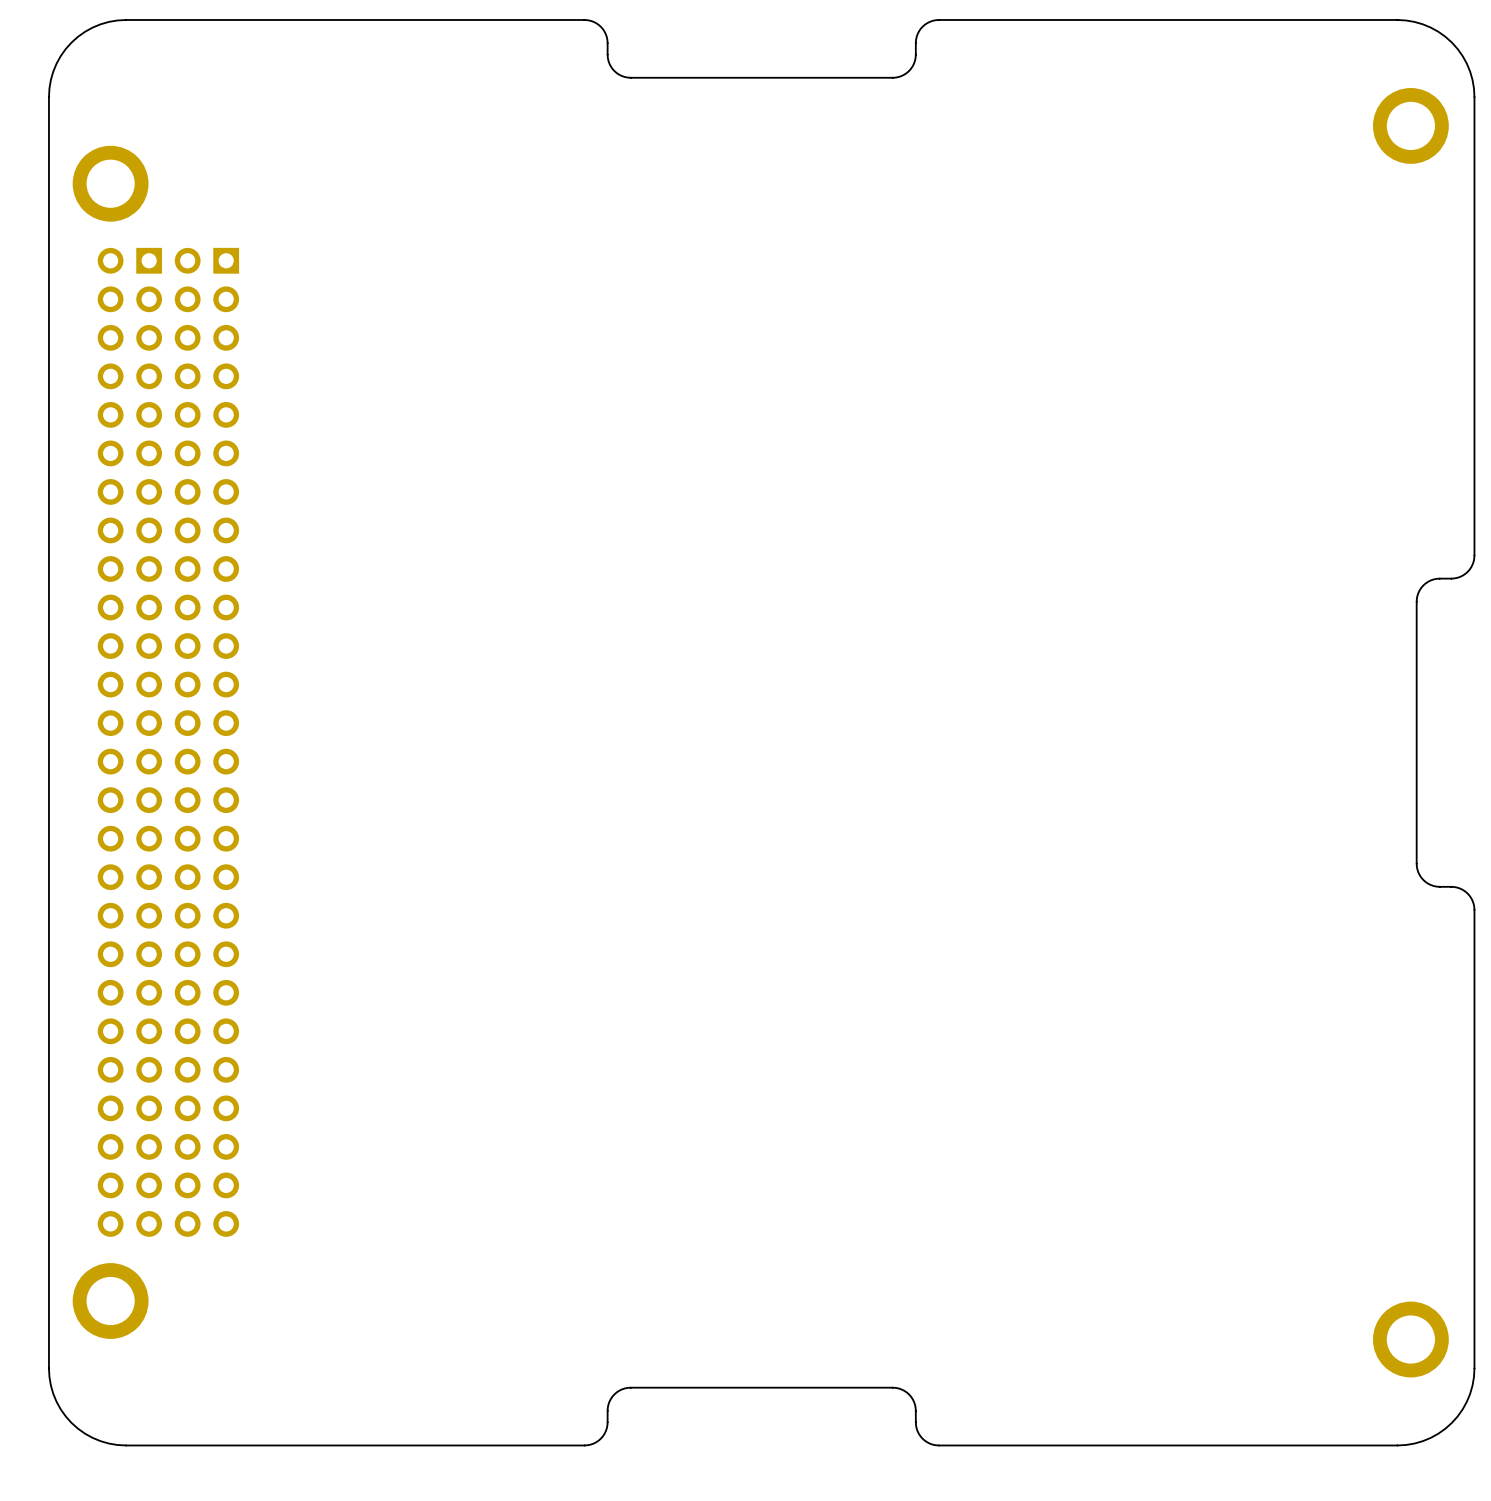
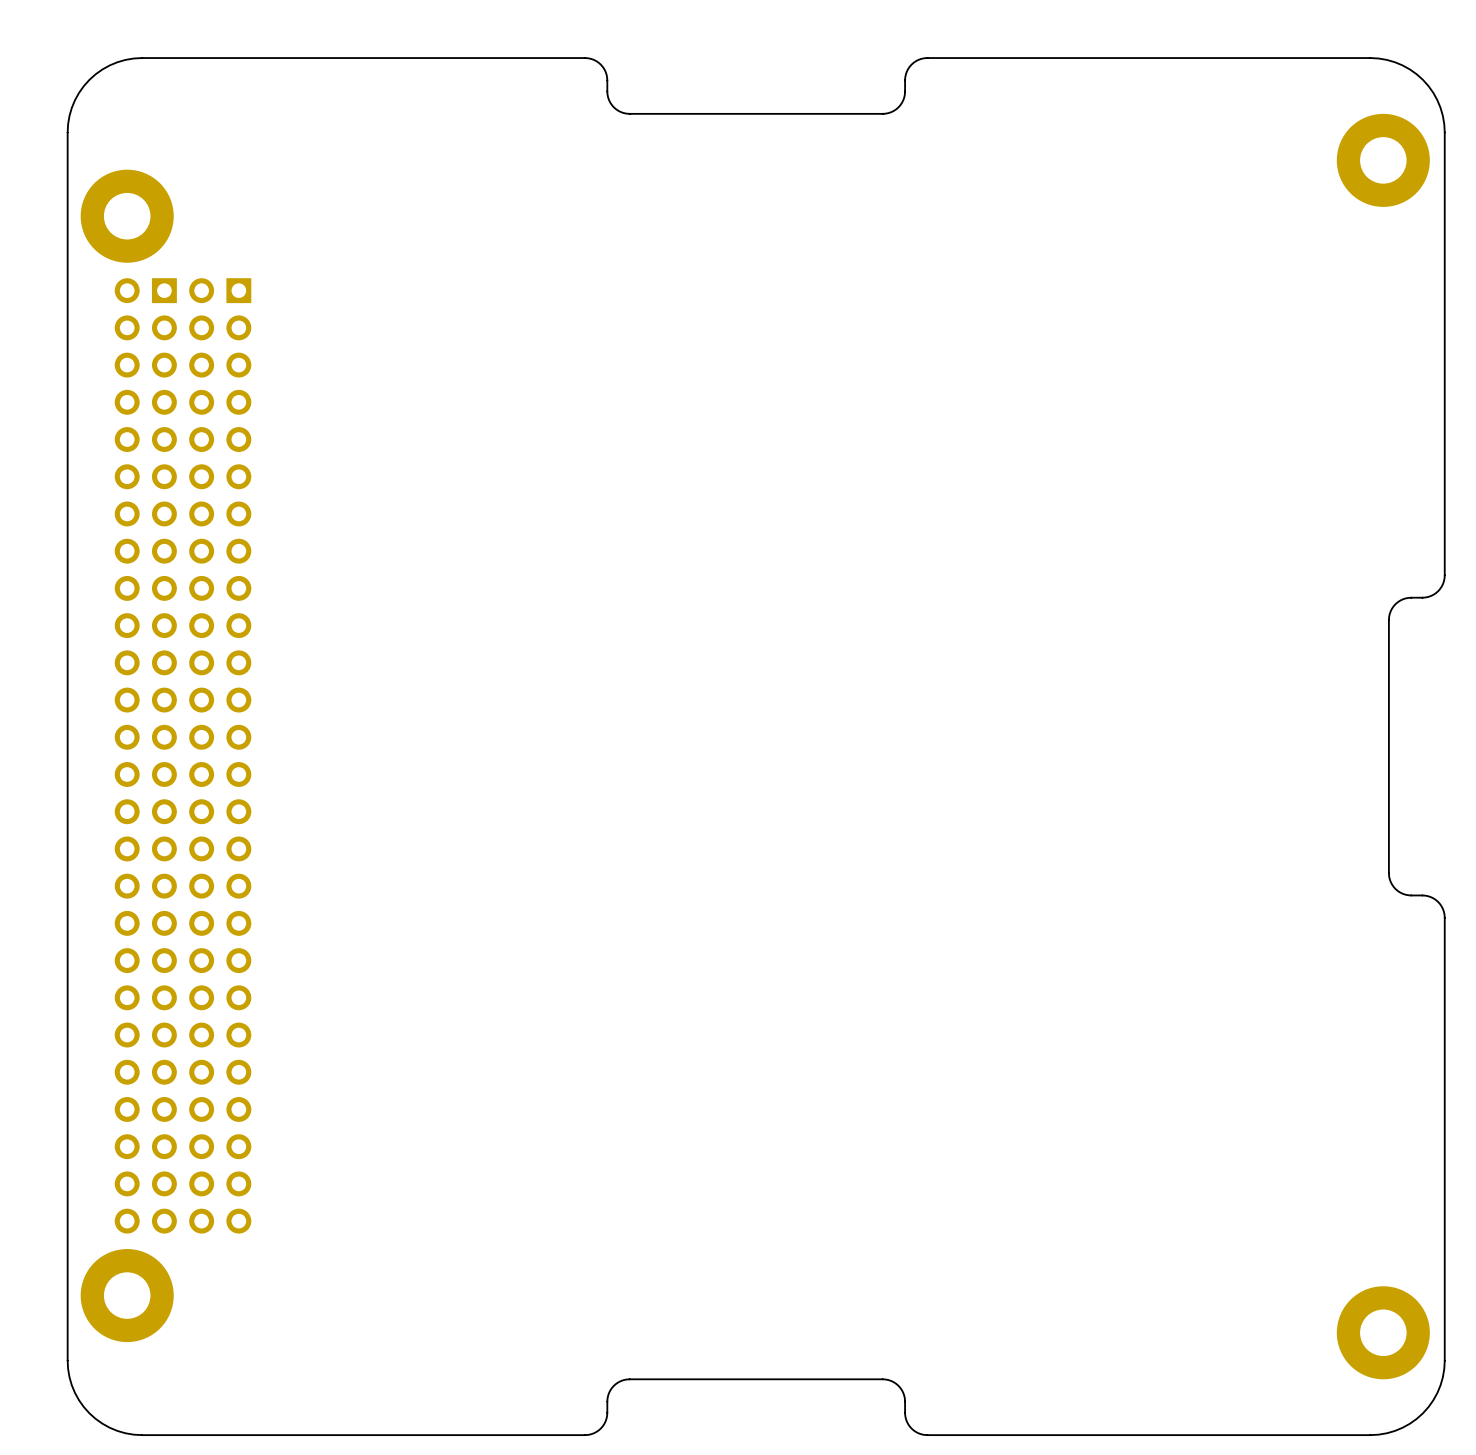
part footprint: [1372, 88, 1449, 164] -> [1336, 113, 1430, 207]
part footprint: [72, 145, 149, 222] -> [80, 169, 174, 263]
part footprint: [72, 1263, 149, 1339] -> [80, 1249, 174, 1343]
part footprint: [1372, 1301, 1449, 1378] -> [1336, 1286, 1430, 1380]

